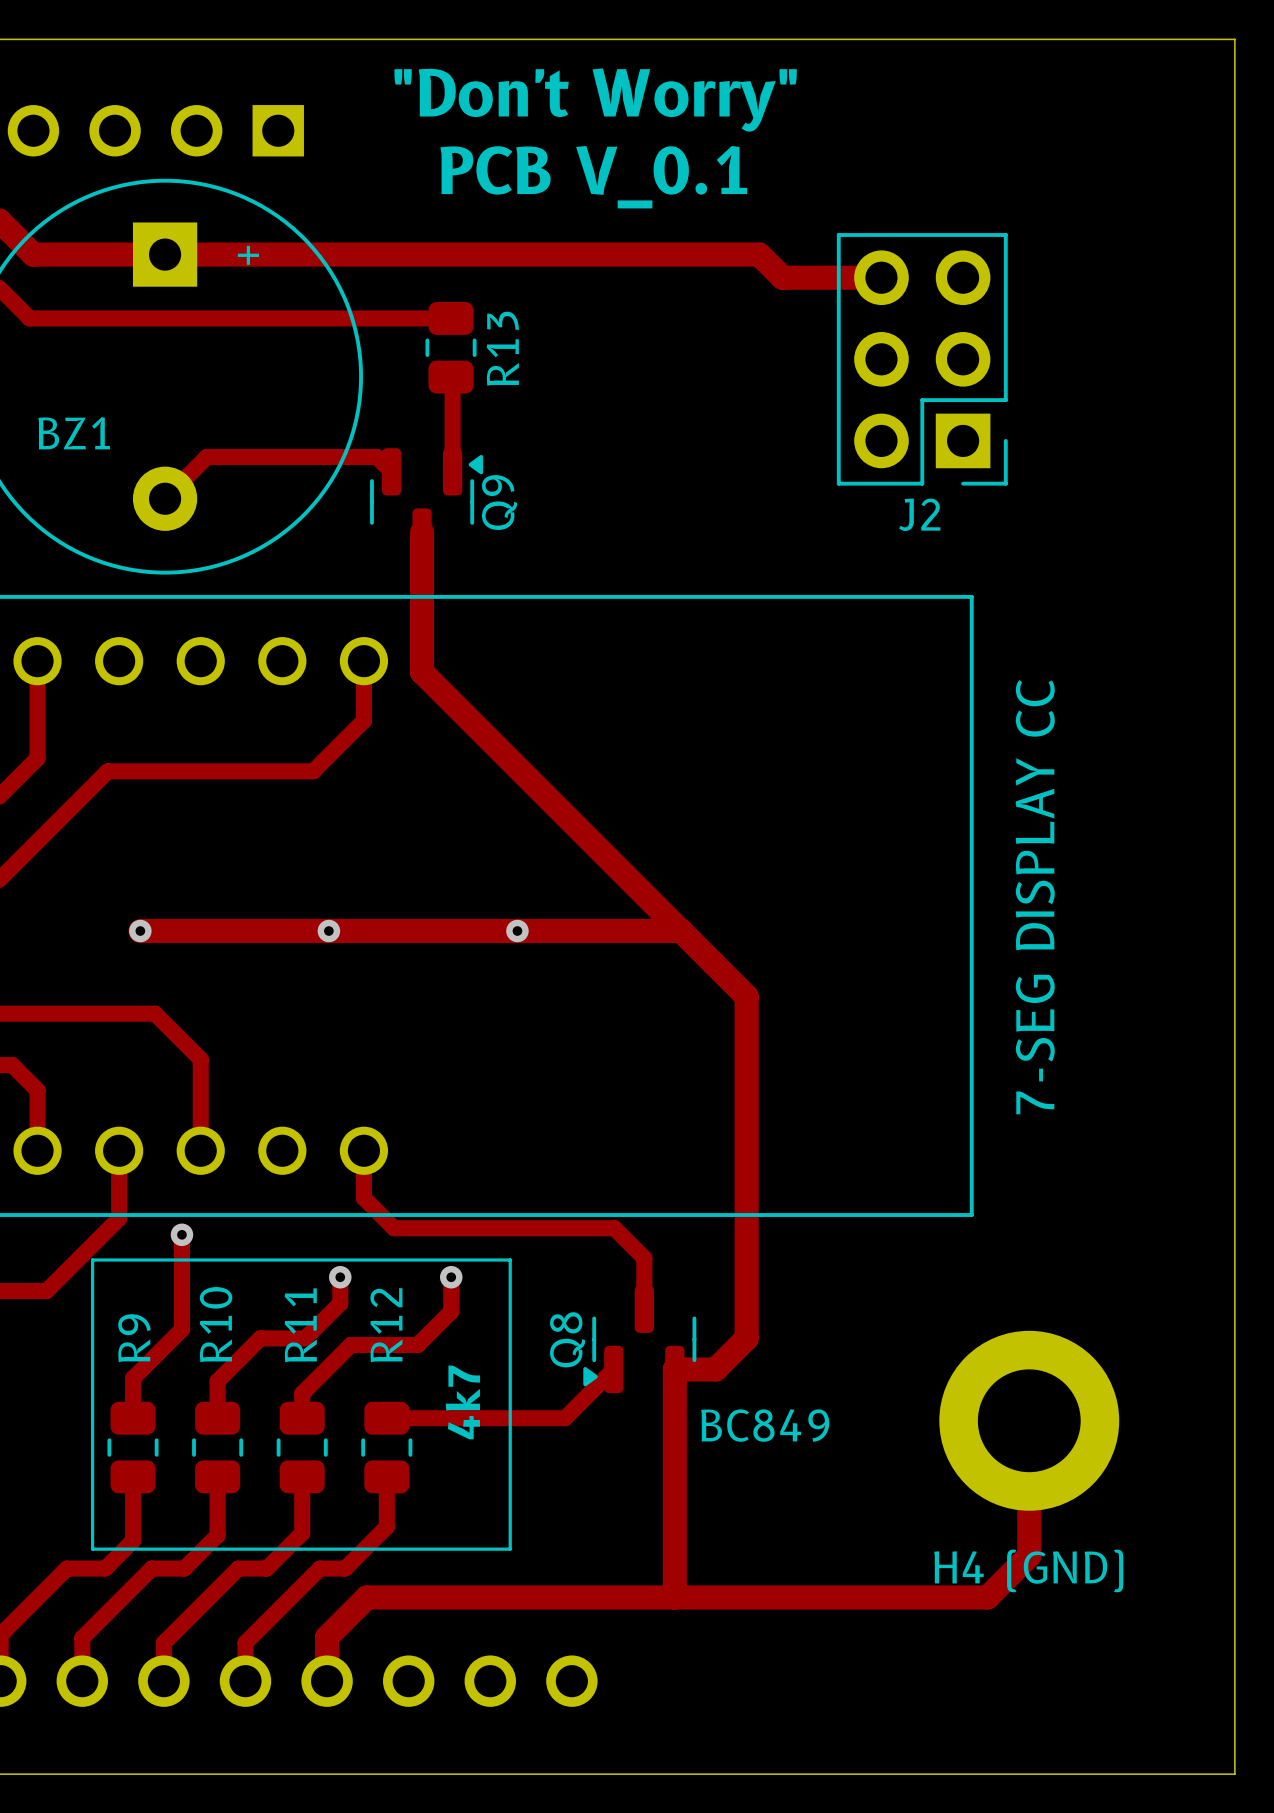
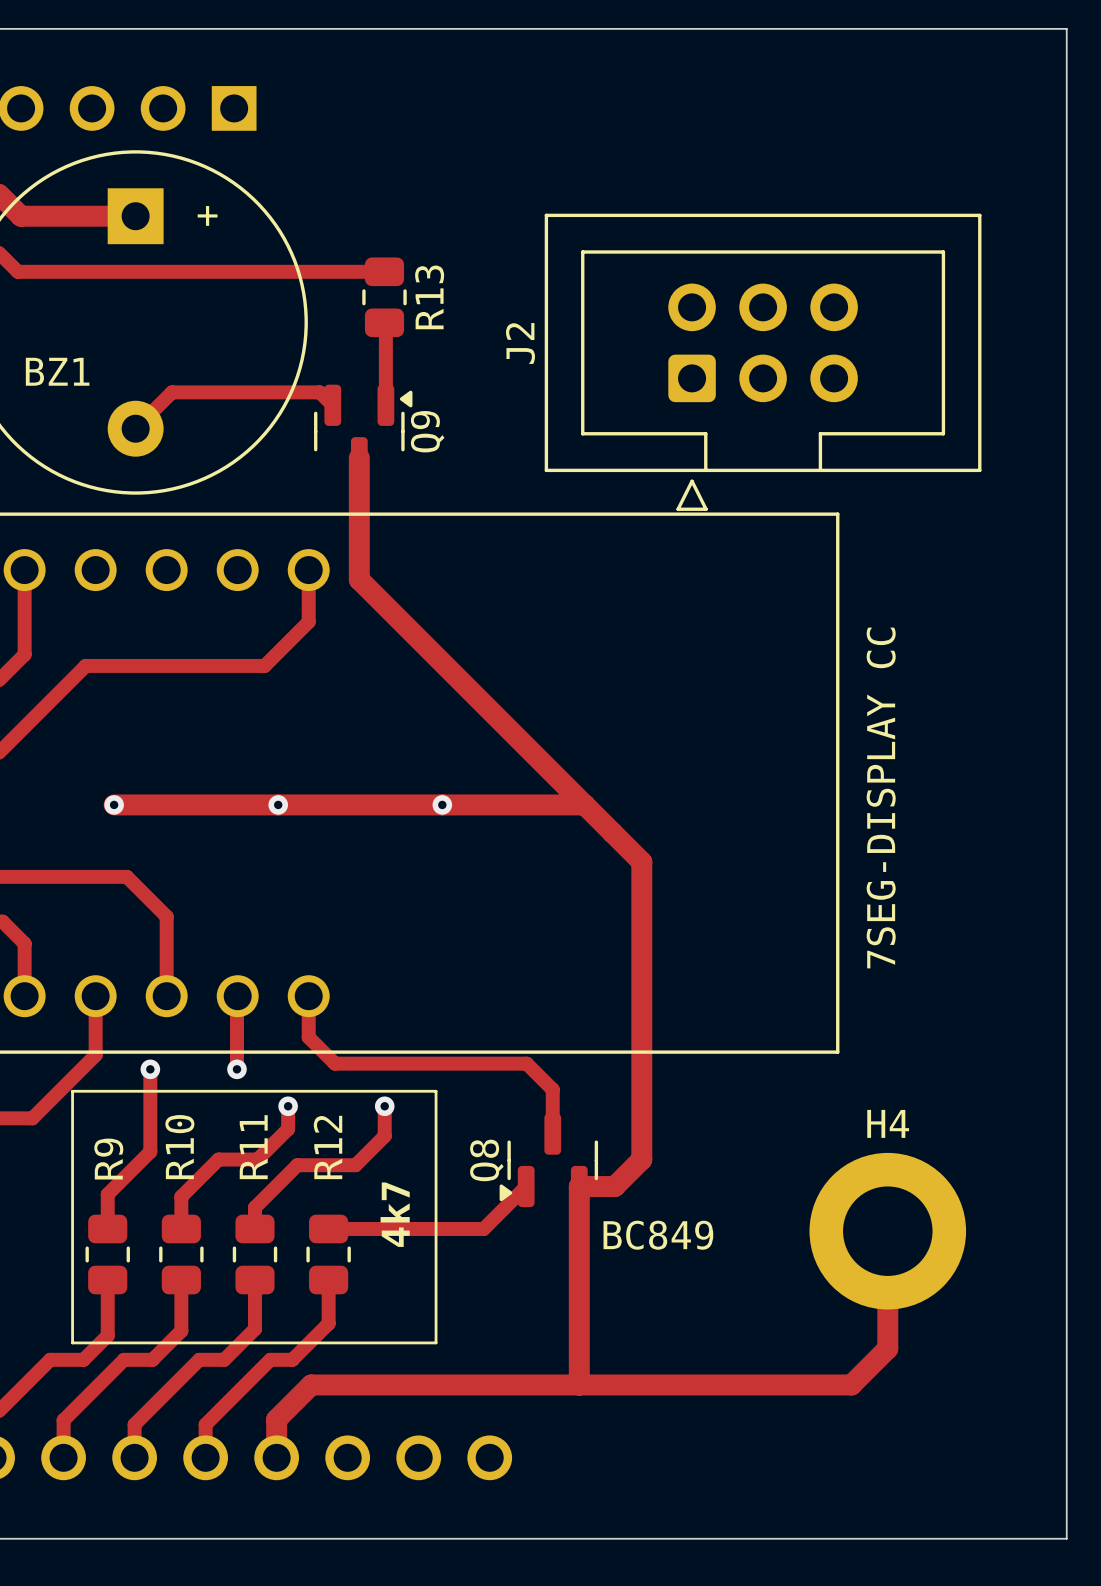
text: "Don't Worry" (595, 99) -> none
text: PCB V_0.1 (593, 177) -> none
J2 footprint: [836, 233, 1008, 486] -> [544, 213, 982, 511]
track: (165, 254) (759, 254) (782, 277) (881, 277) -> none
J2 name position: J2 (919, 514) -> J2 (520, 343)
7-SEG DISPLAY CC name: 7-SEG DISPLAY CC (1035, 897) -> 7SEG-DISPLAY CC (881, 798)
track: none -> (236, 996) (236, 1069)
via: none -> (236, 1069)
H4 (GND) name: H4 (GND) (1028, 1570) -> H4 (888, 1123)

